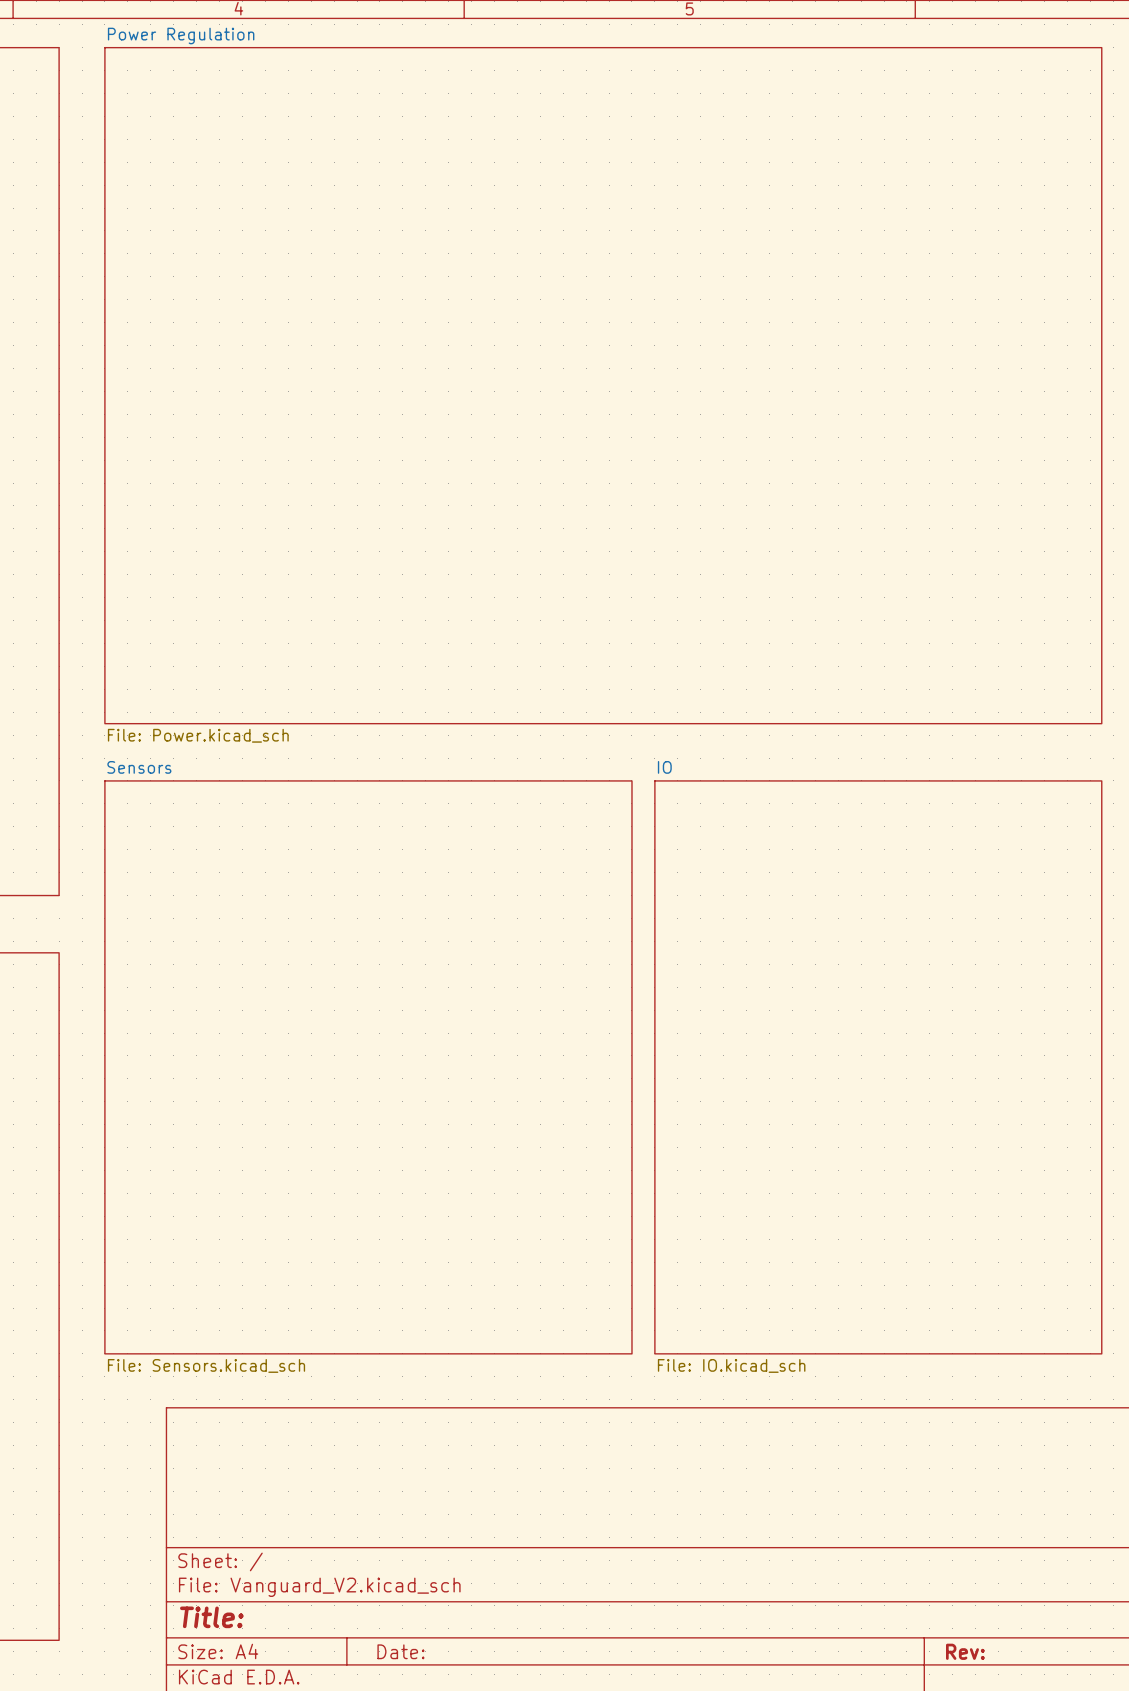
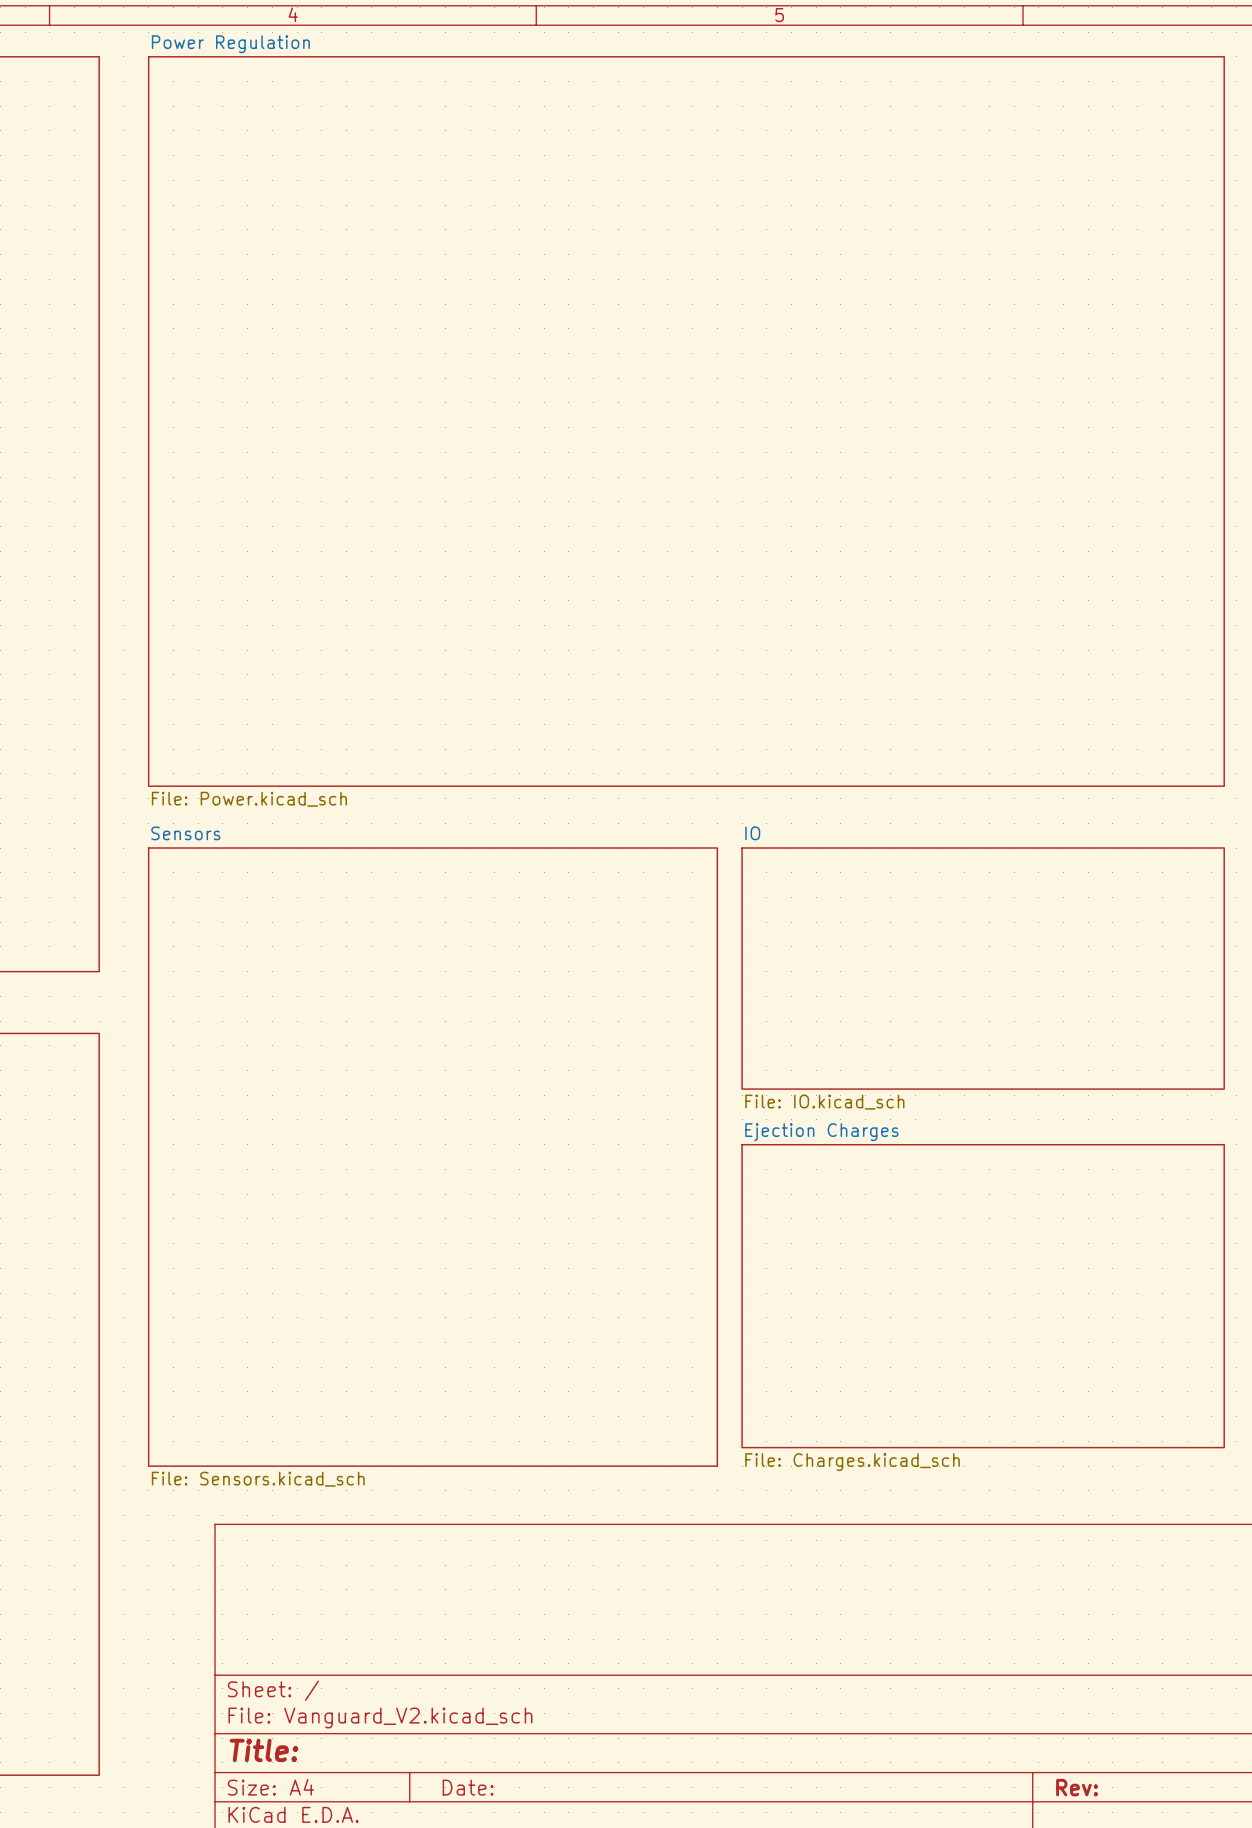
sheet IO: none -> File: IO.kicad_sch (983, 968)
sheet IO: File: IO.kicad_sch (878, 1067) -> none
sheet Ejection Charges: none -> File: Charges.kicad_sch (983, 1296)

